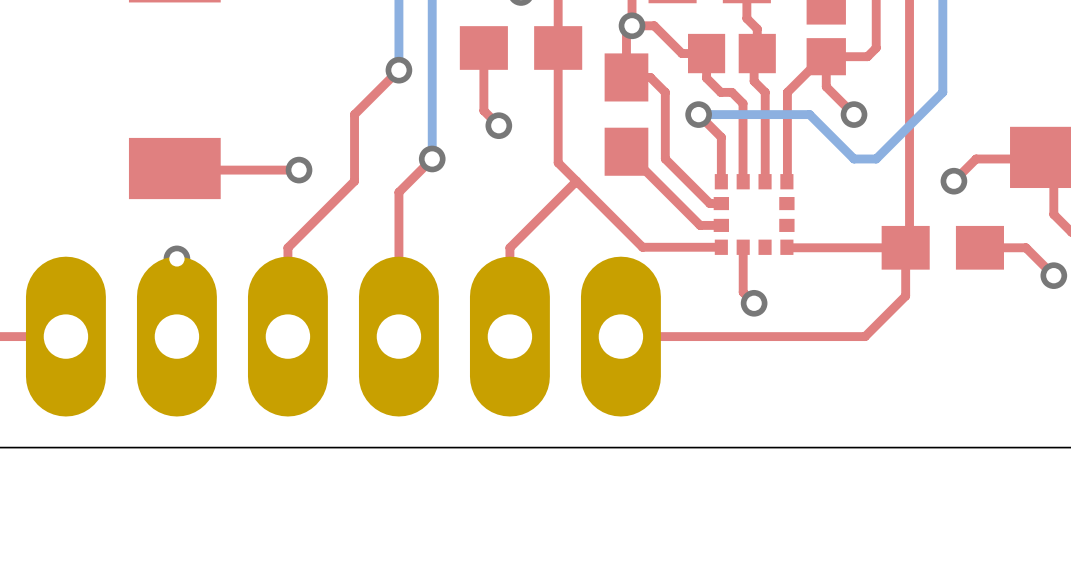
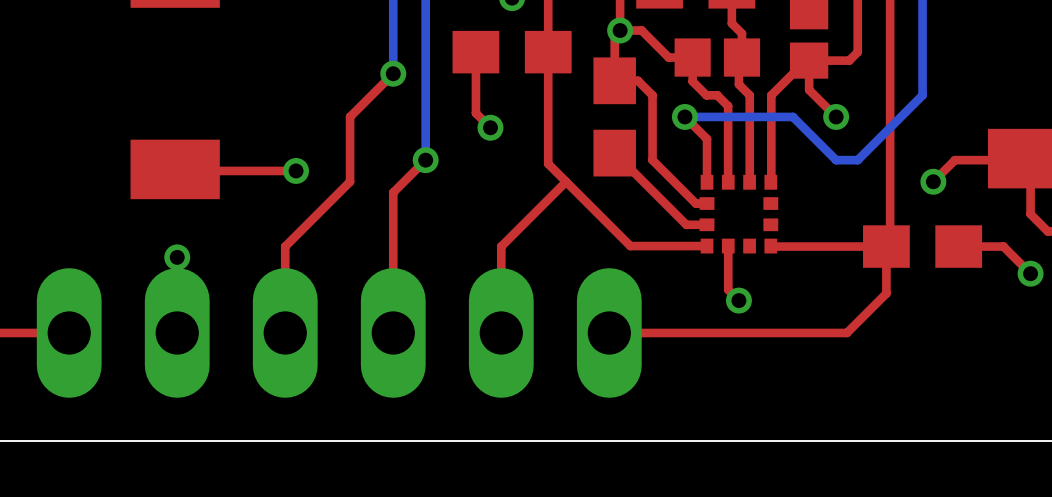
part footprint: [25, 256, 661, 417] -> [36, 268, 642, 398]

